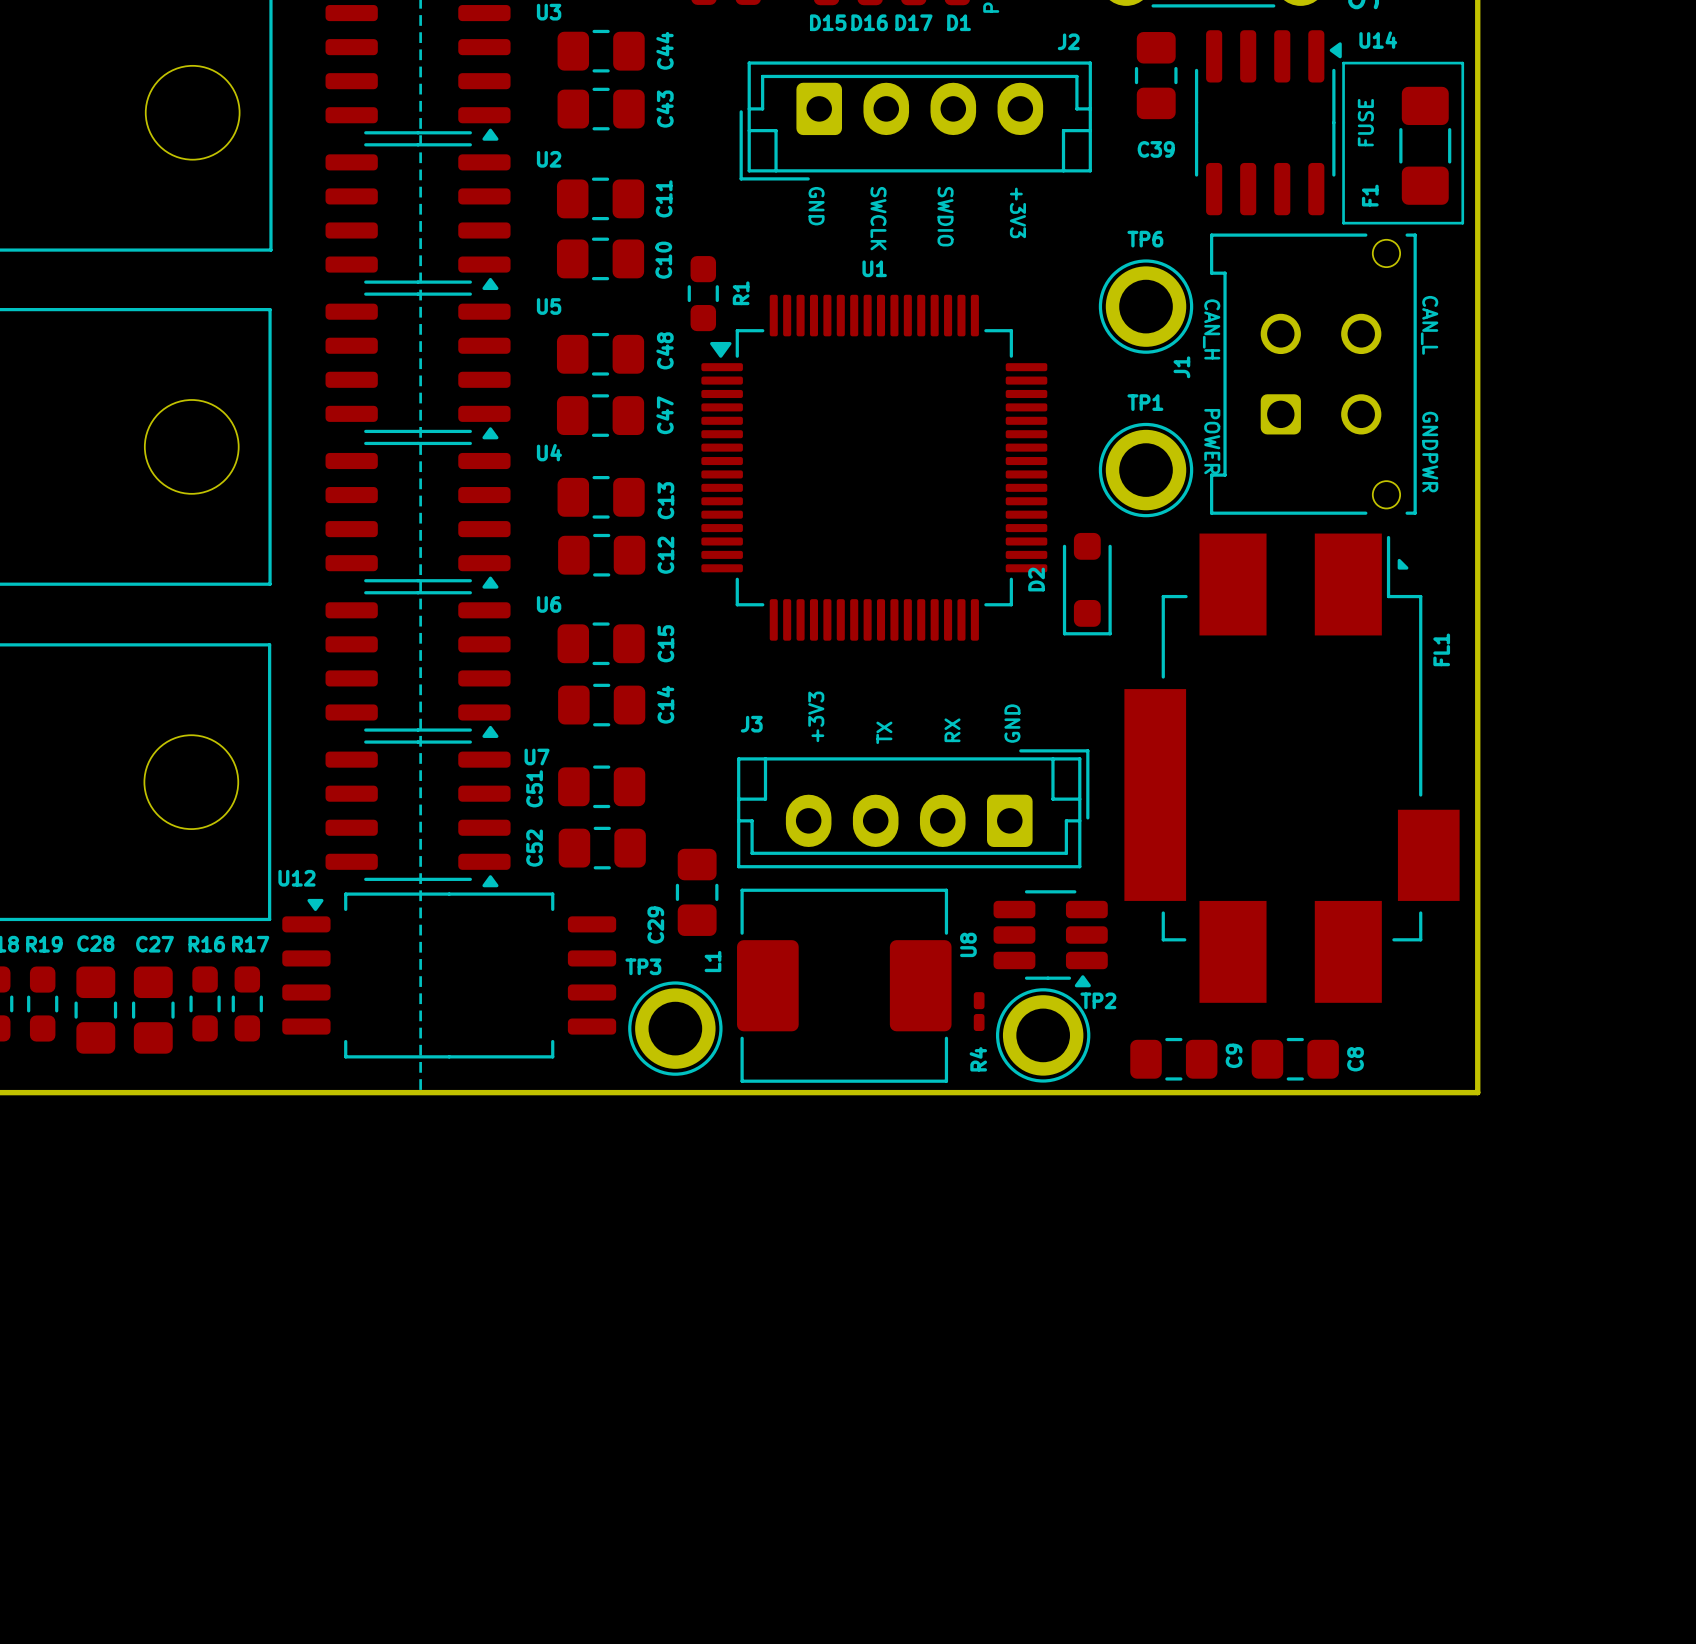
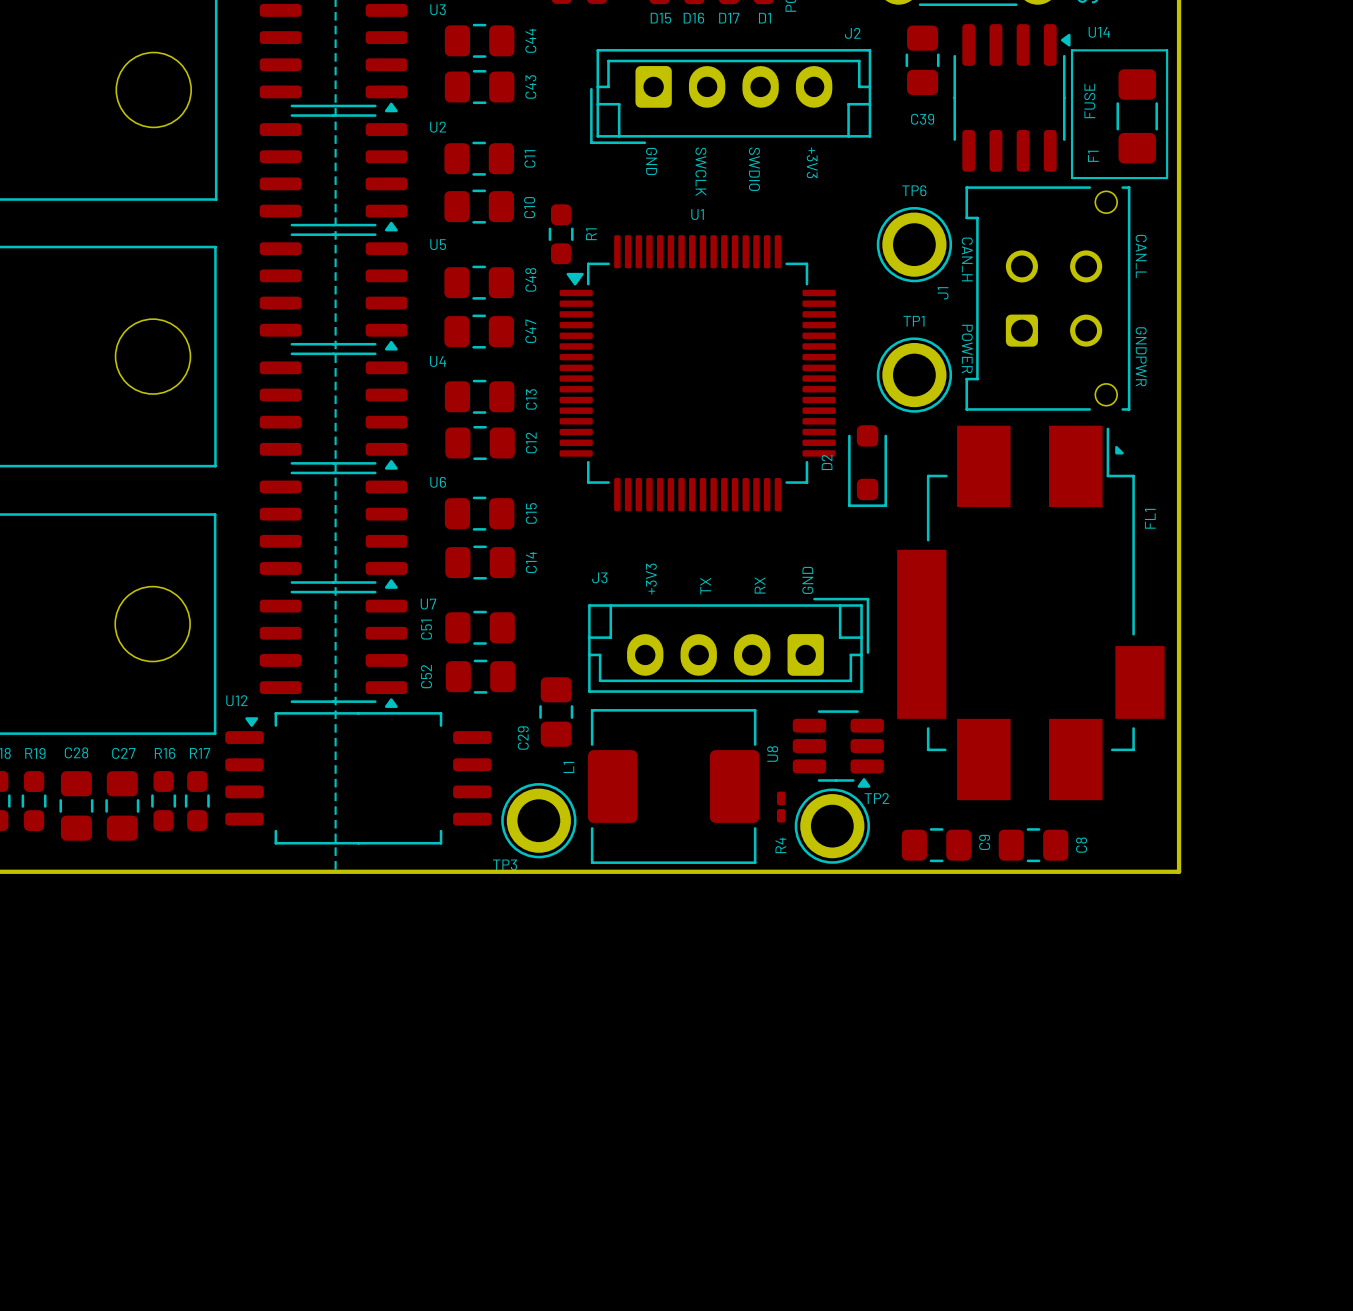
TP3 name position: TP3 (643, 966) -> TP3 (504, 864)

